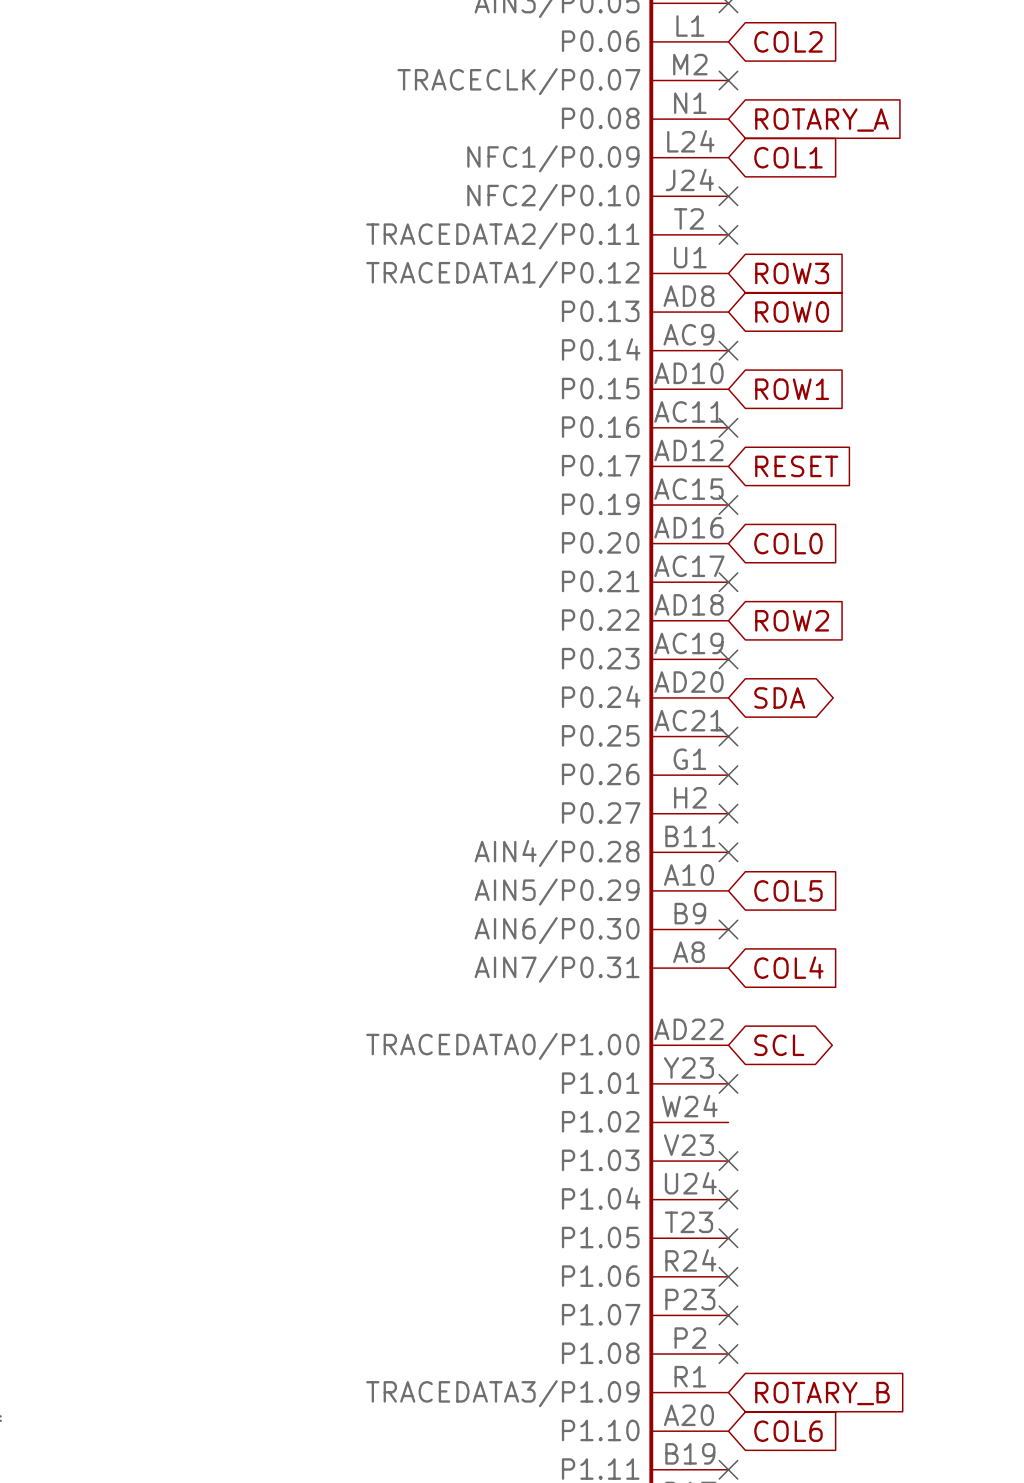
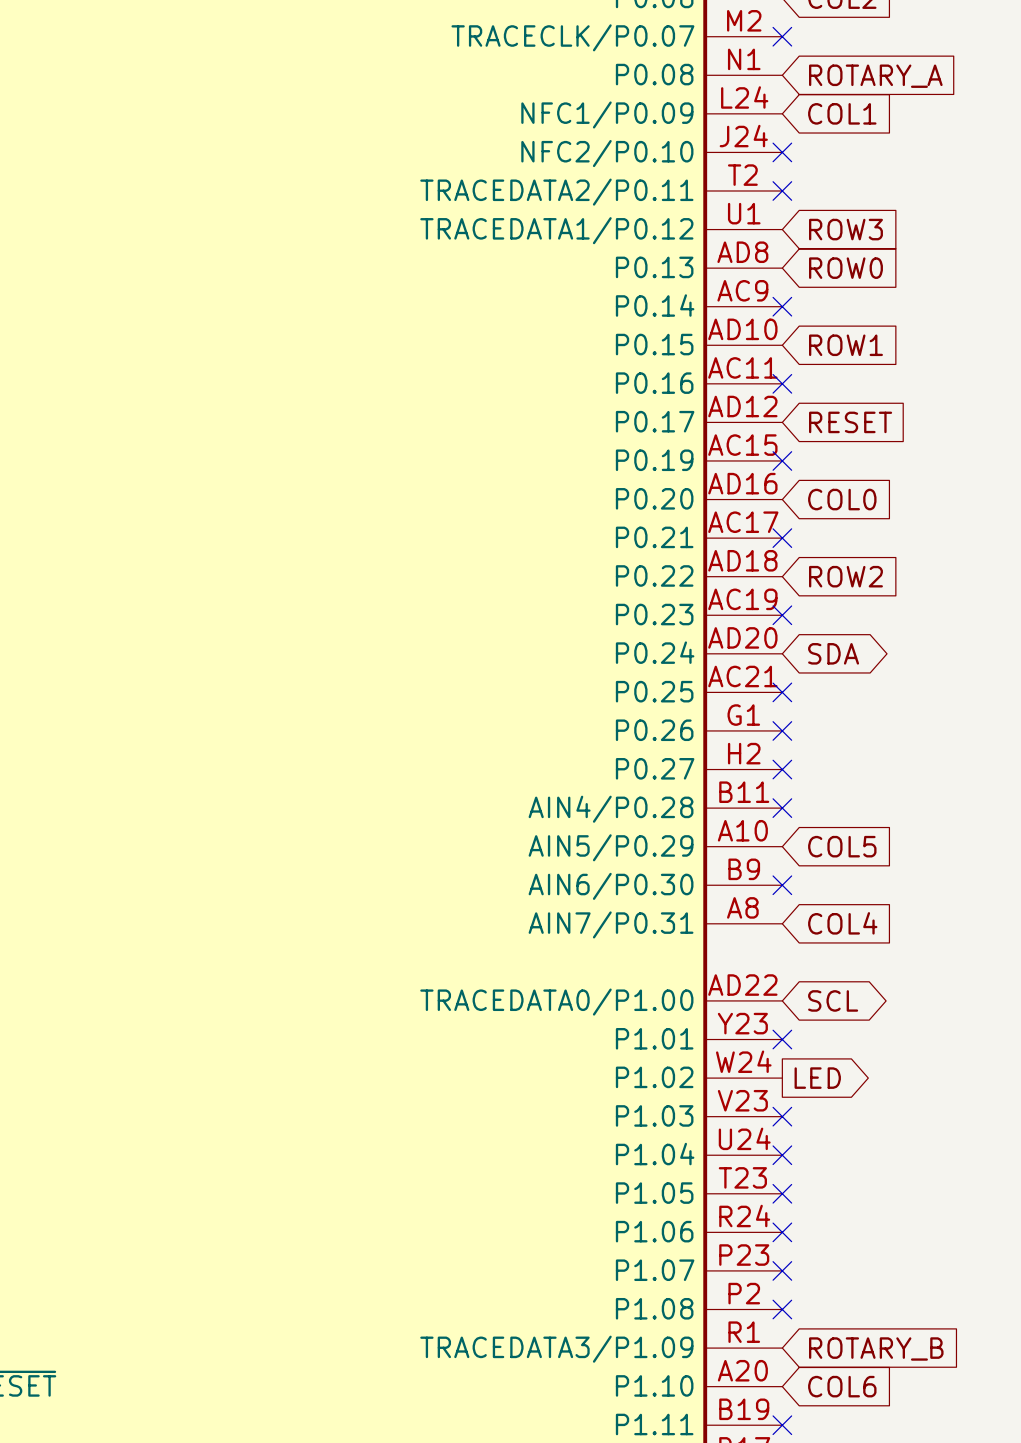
global label: none -> LED (817, 1078)

